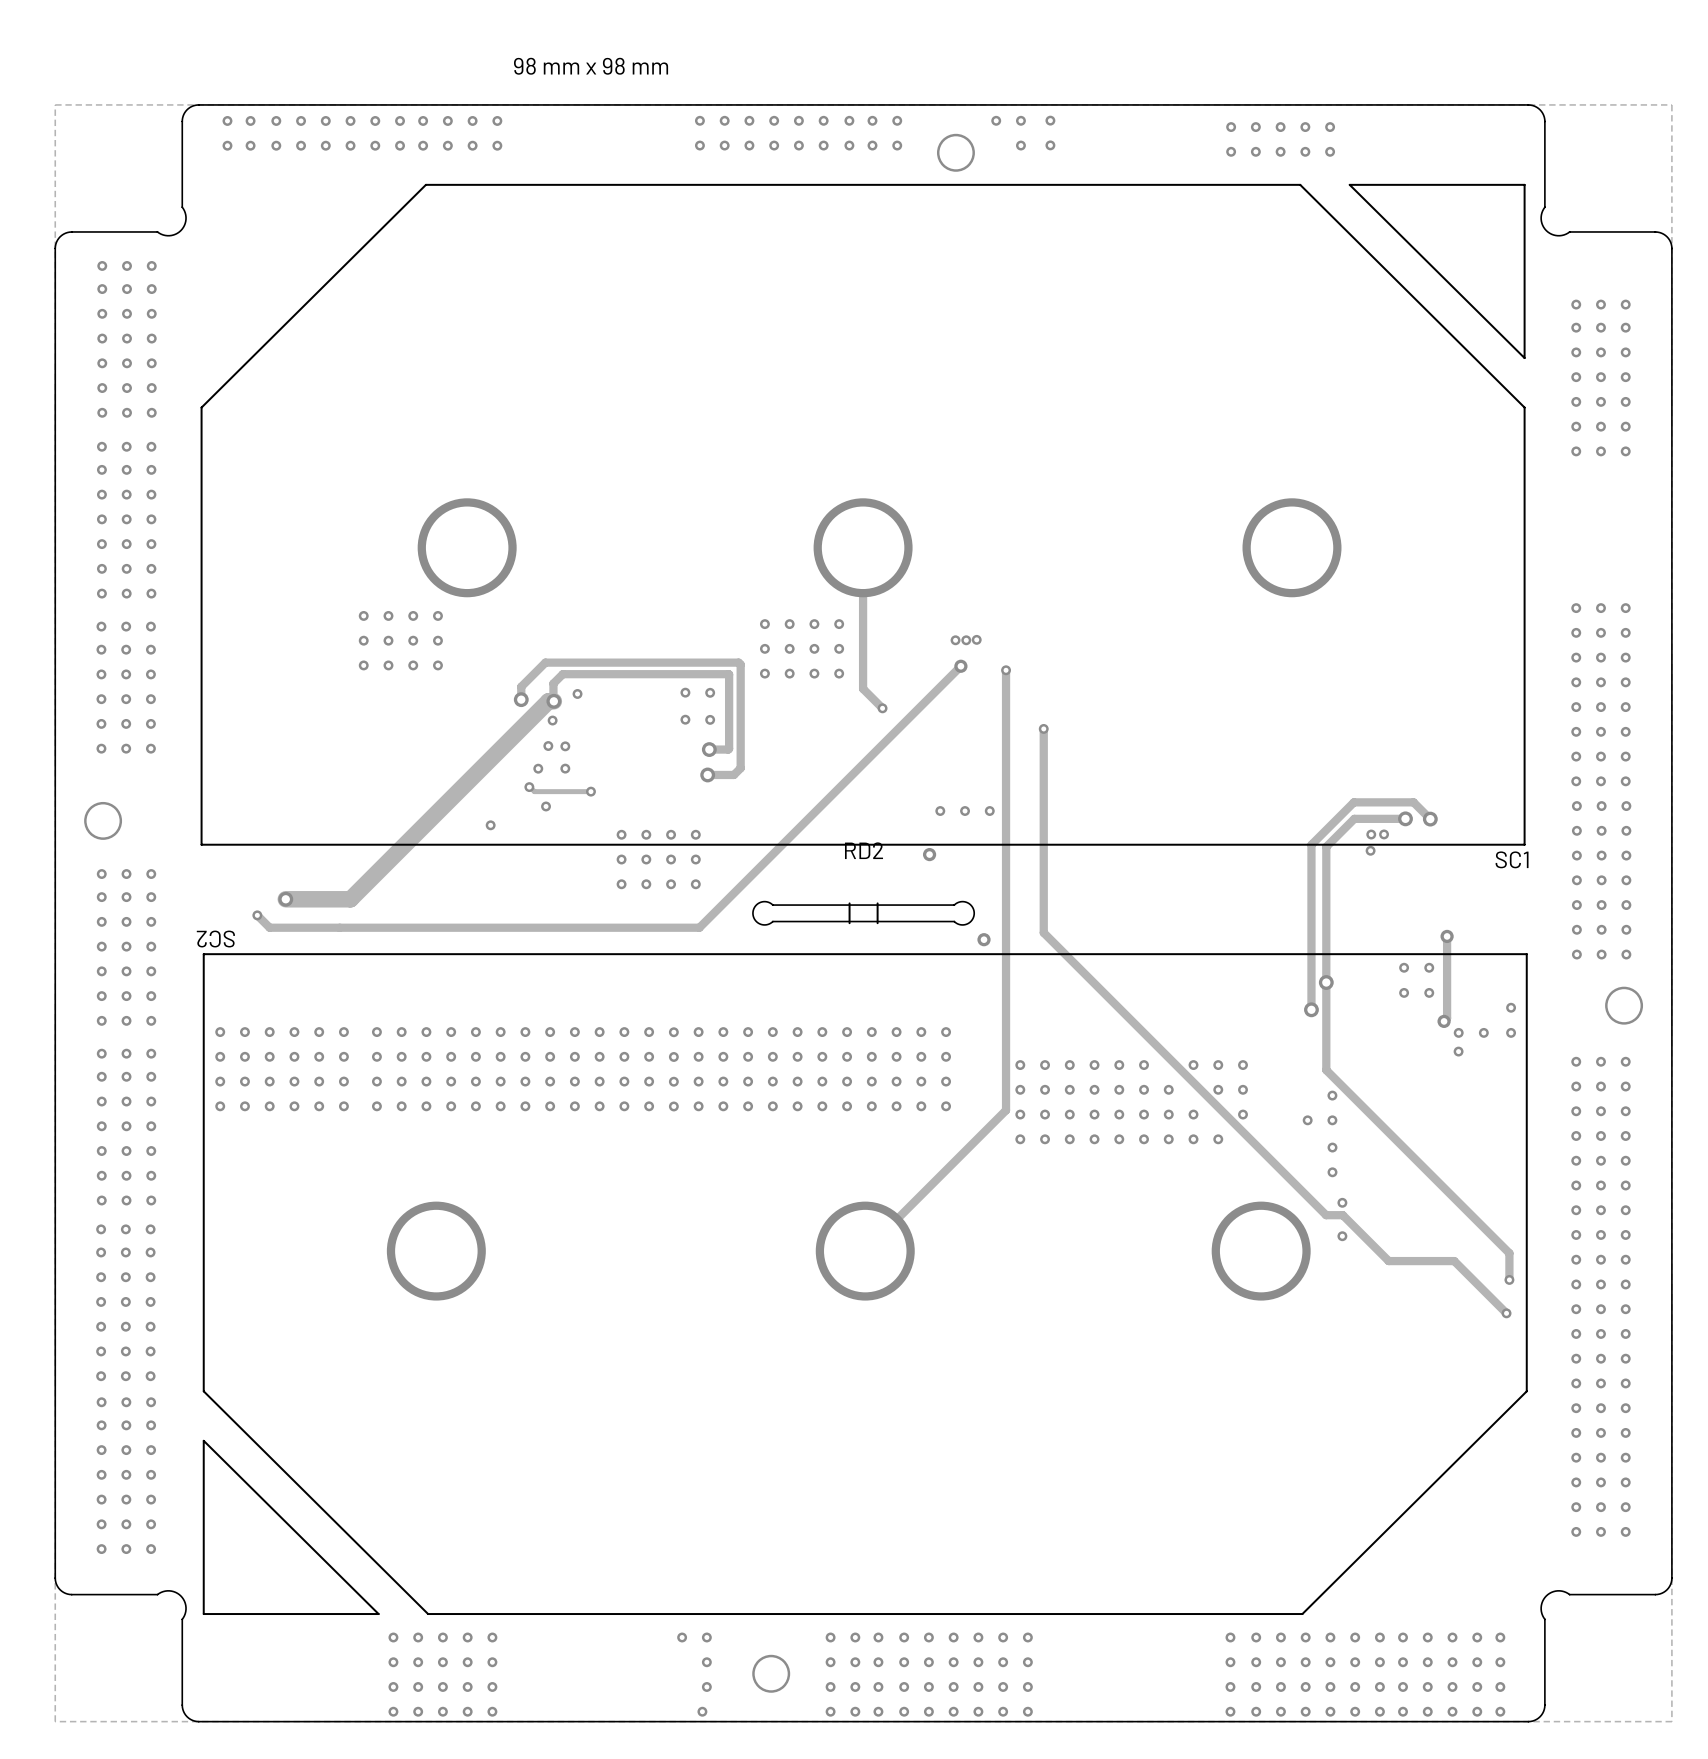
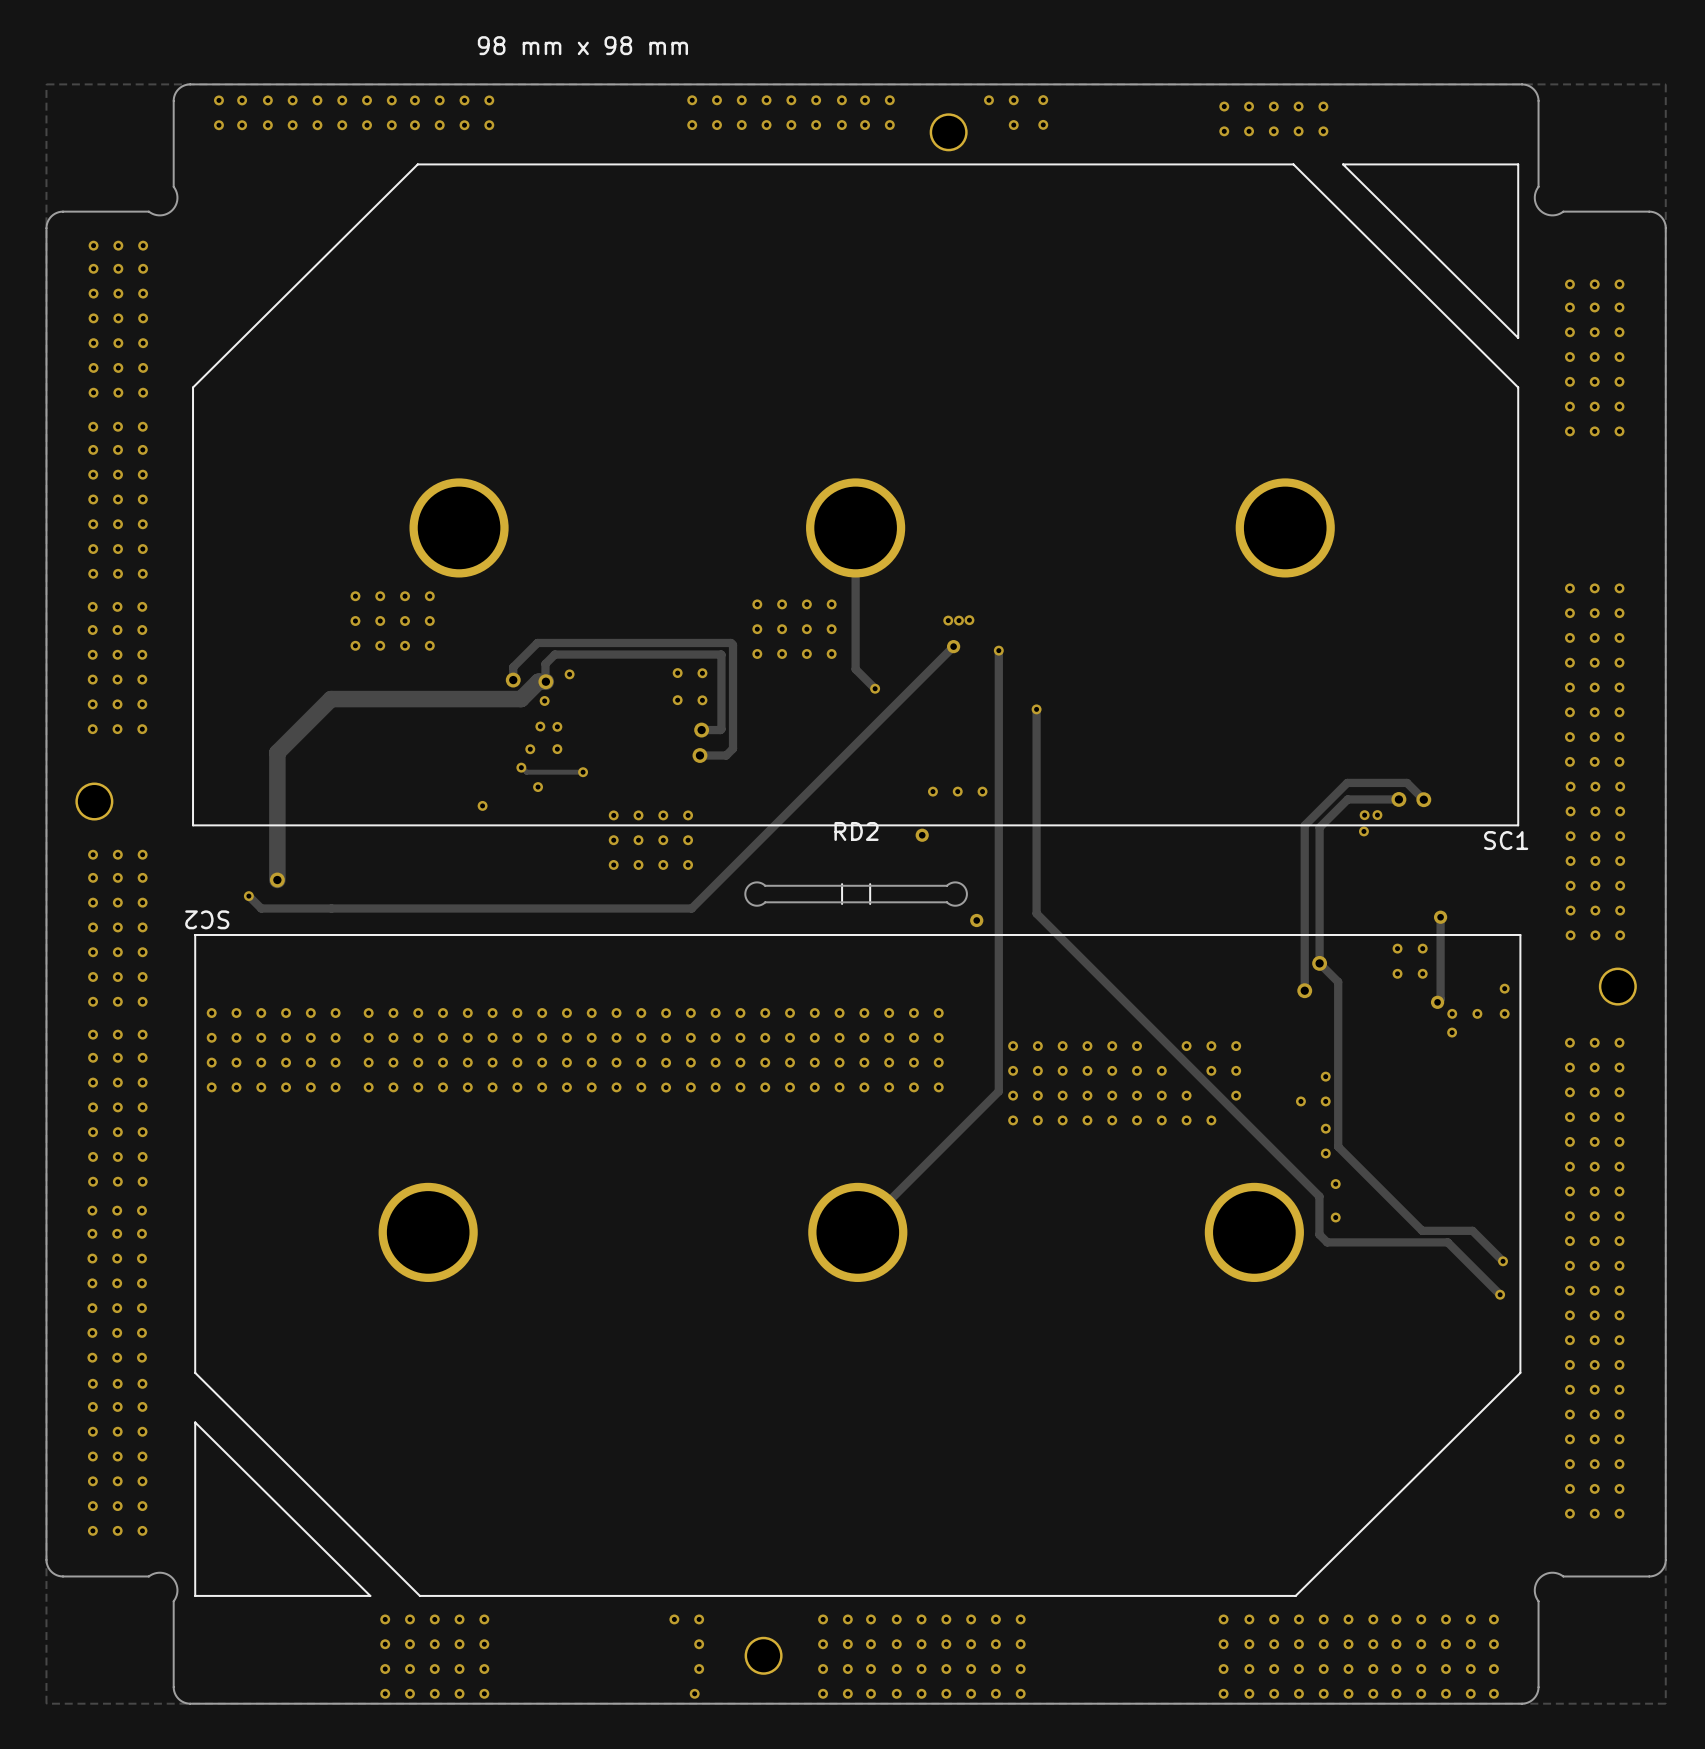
track: (548, 701) (350, 899) (285, 899) -> (540, 681) (521, 699) (331, 699) (277, 752) (277, 880)
track: (1326, 982) (1326, 1070) (1509, 1253) (1509, 1279) -> (1319, 963) (1338, 981) (1338, 1146) (1422, 1230) (1472, 1230) (1503, 1261)
track: (1326, 1215) (1342, 1215) (1388, 1261) -> (1319, 1196) (1319, 1234) (1327, 1242) (1382, 1242)

